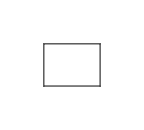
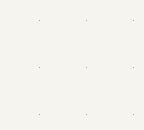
line: (43, 43) (100, 43) (100, 86) (43, 86) (43, 43) -> none

